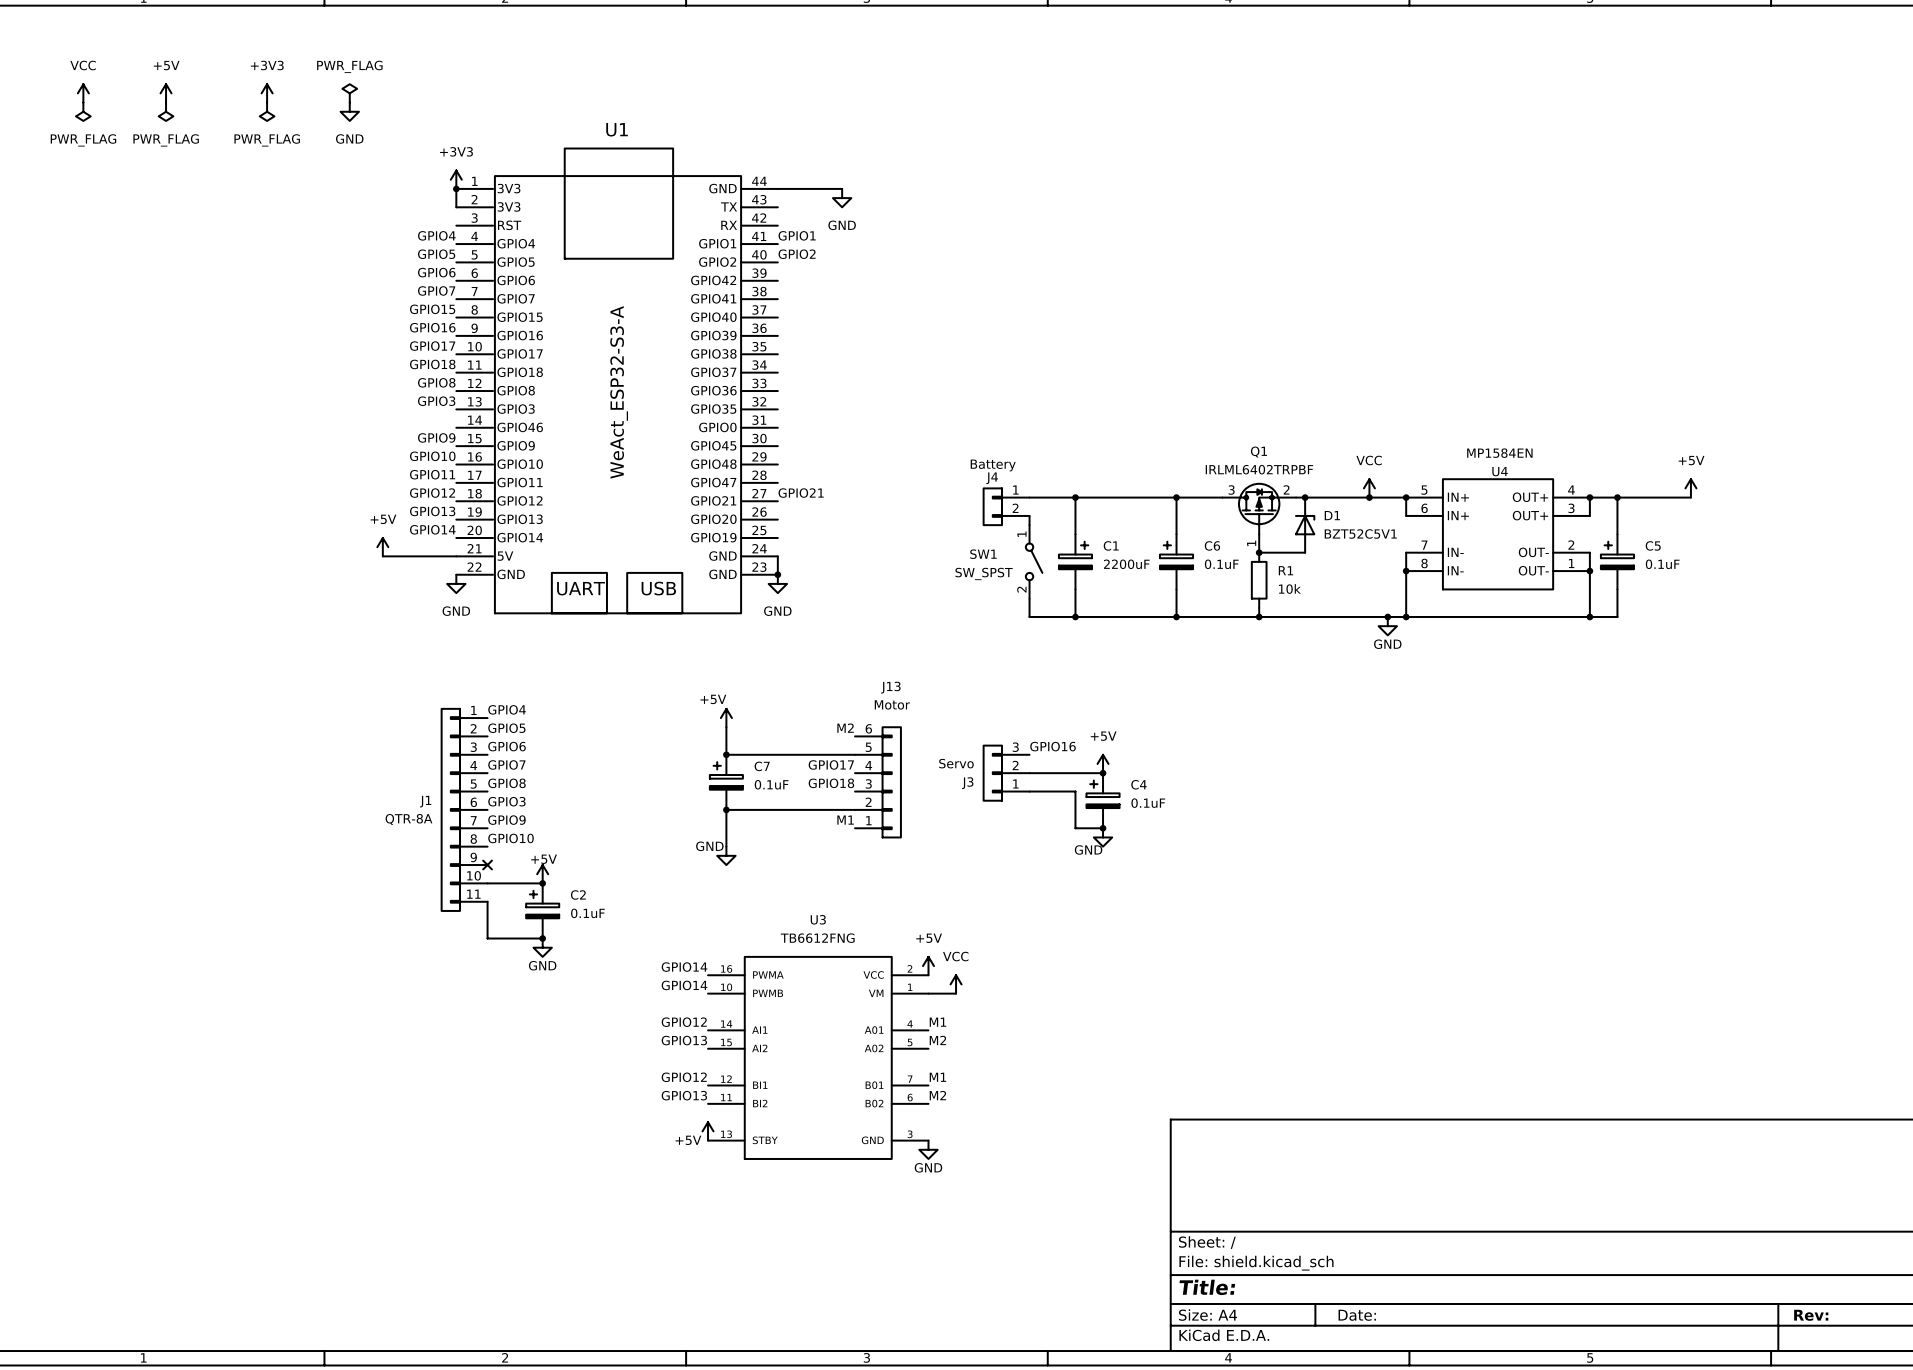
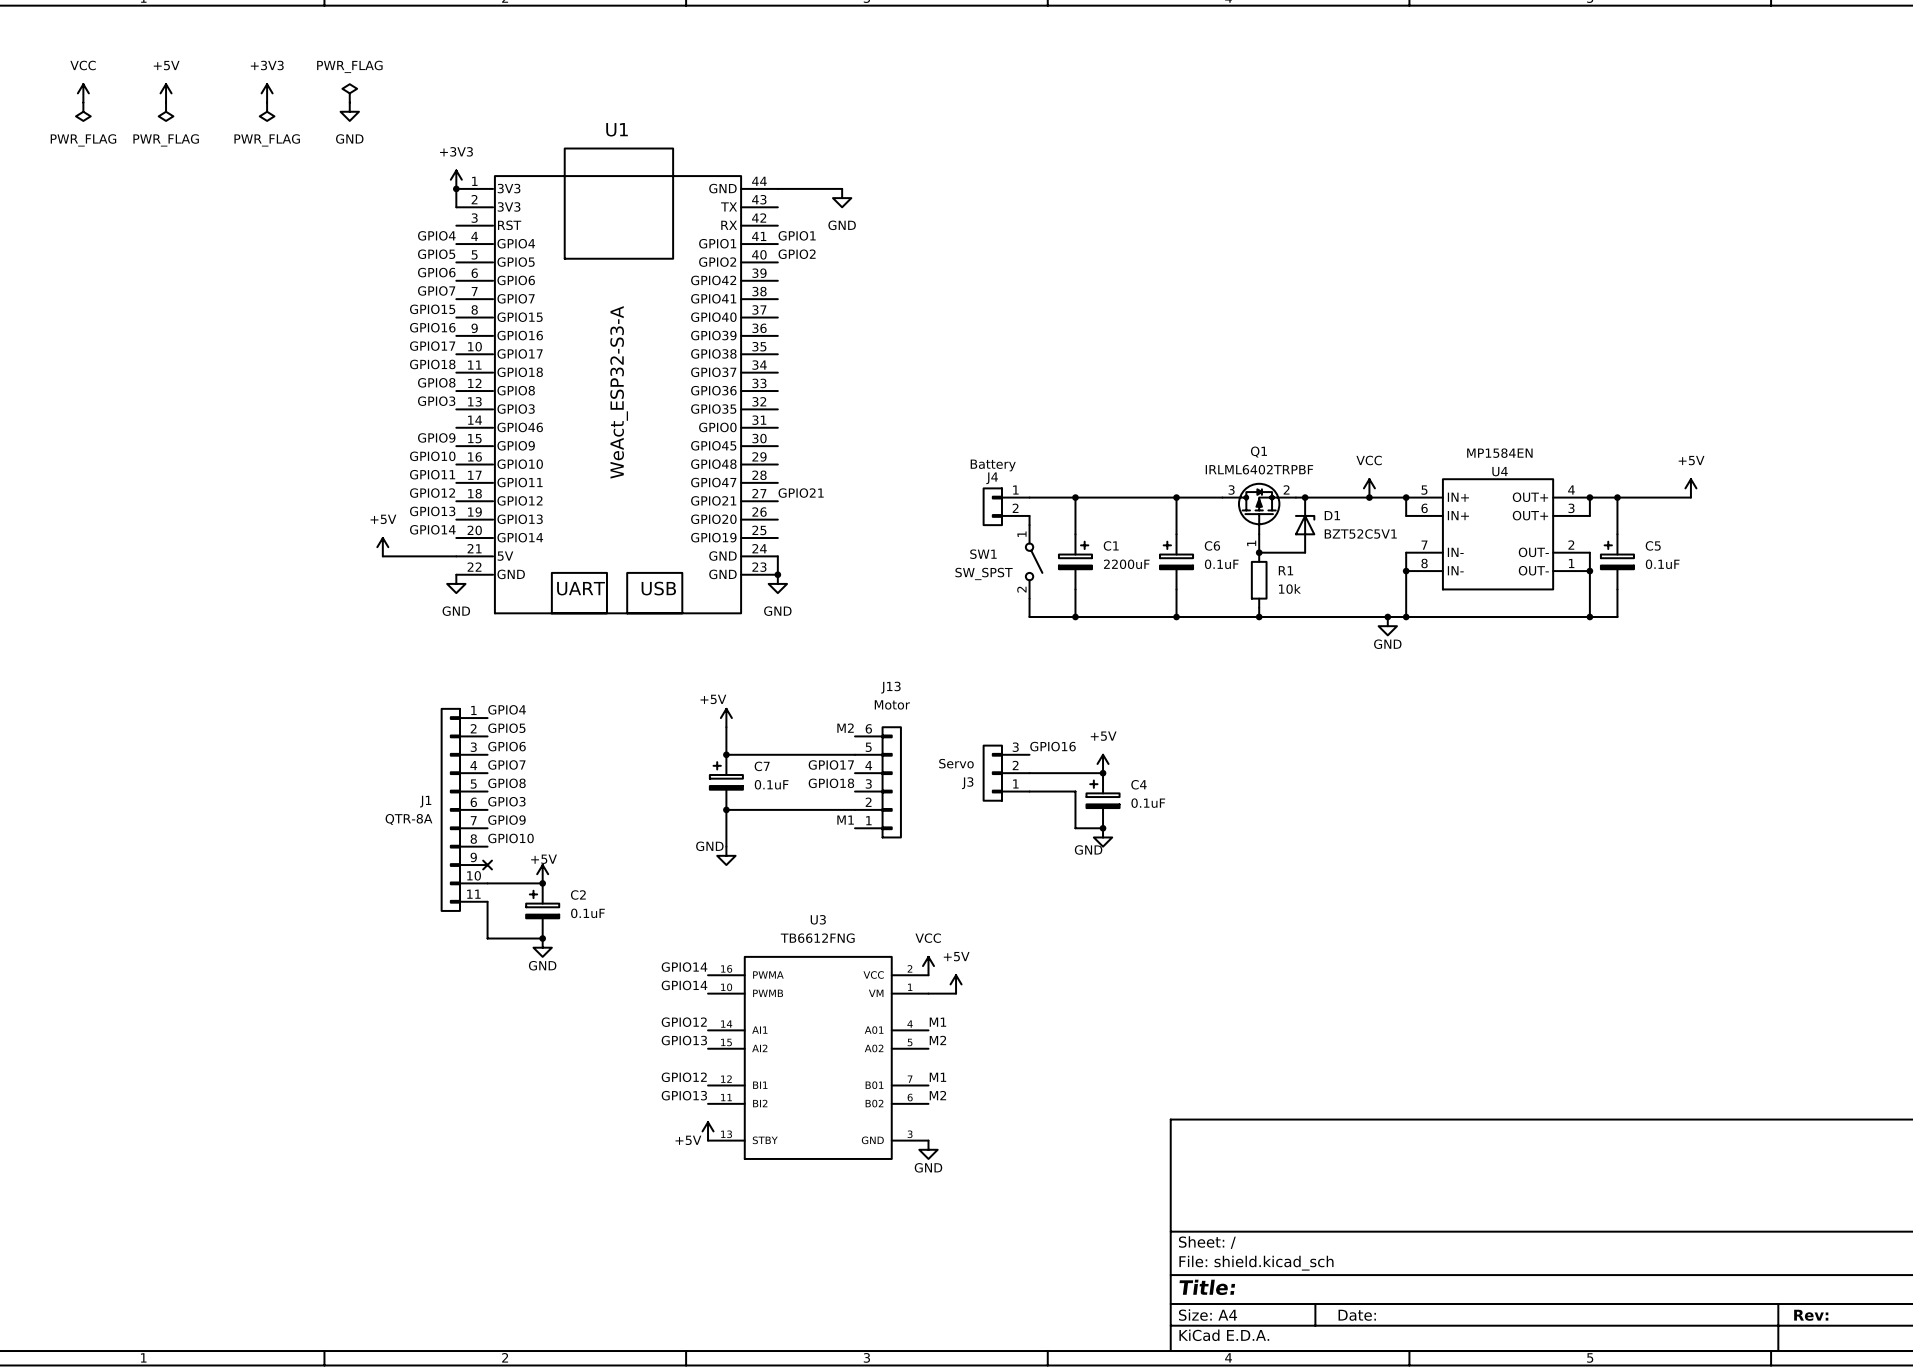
power symbol: +5V (928, 966) -> VCC (928, 966)
power symbol: VCC (956, 984) -> +5V (956, 984)

